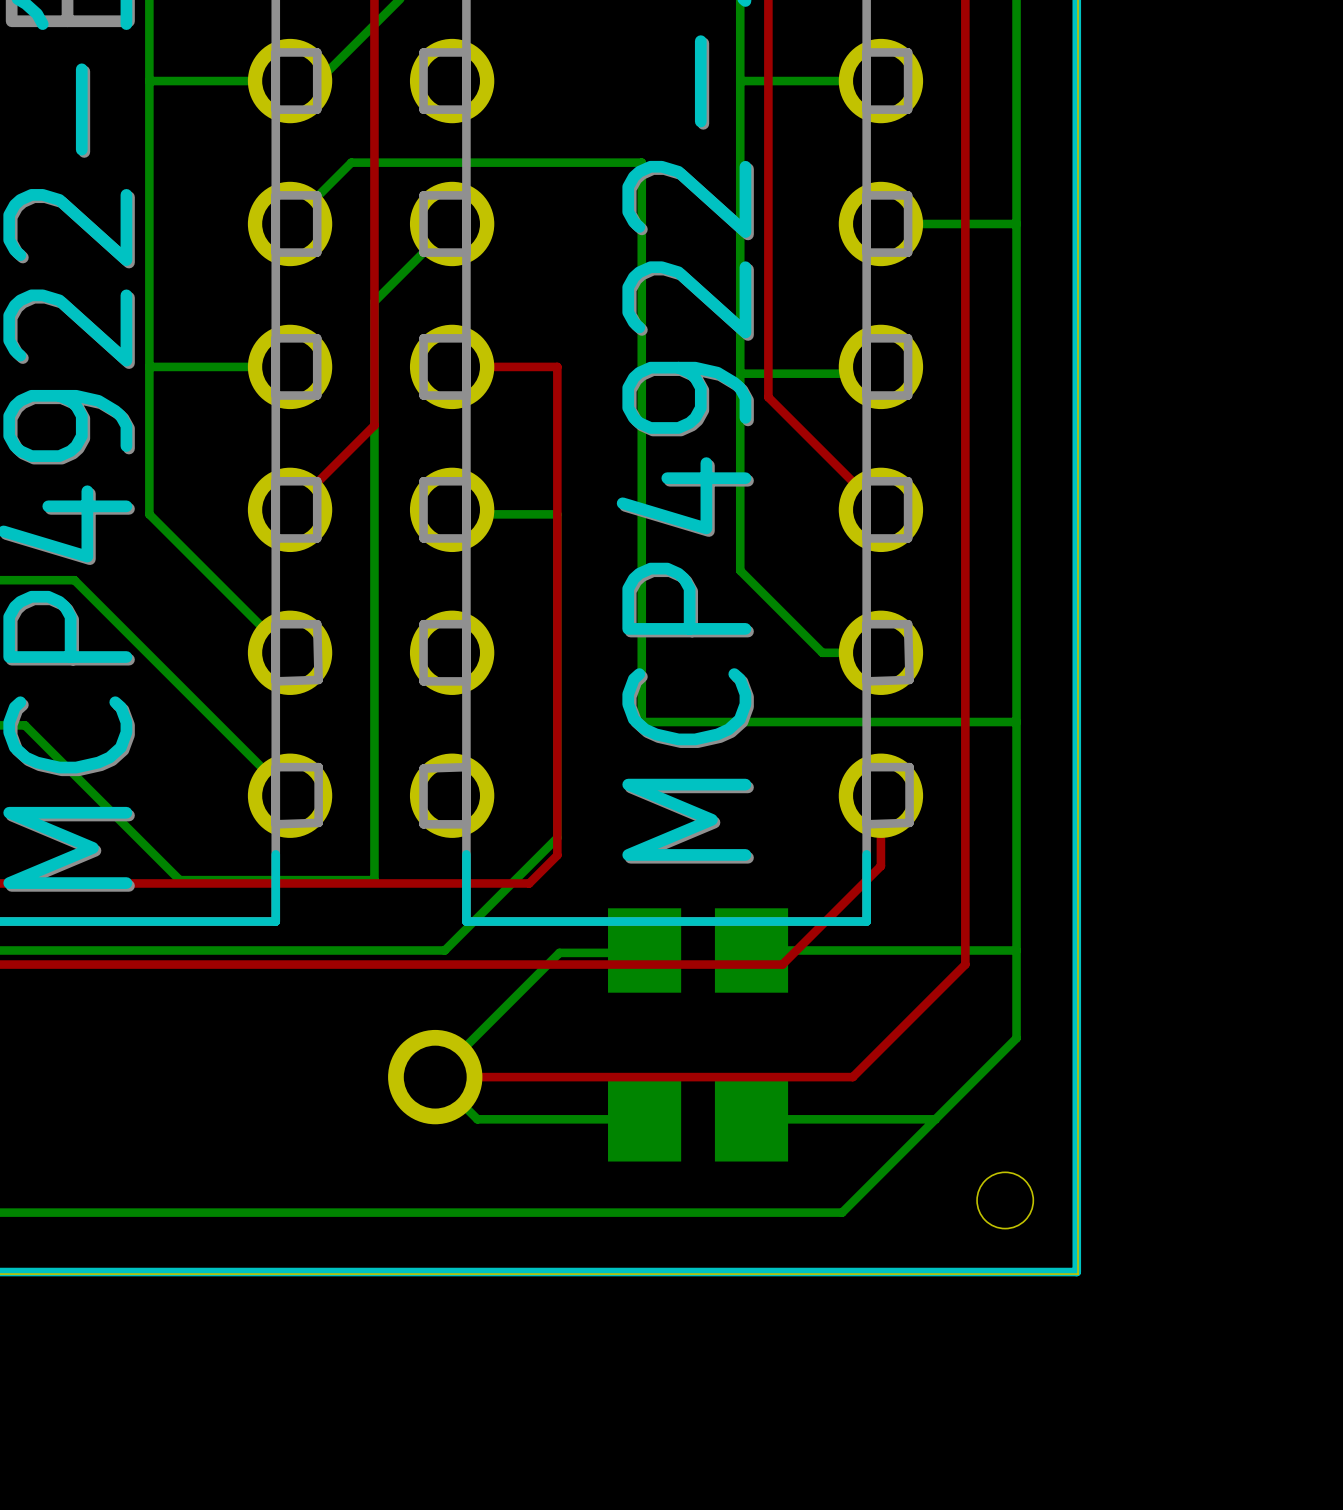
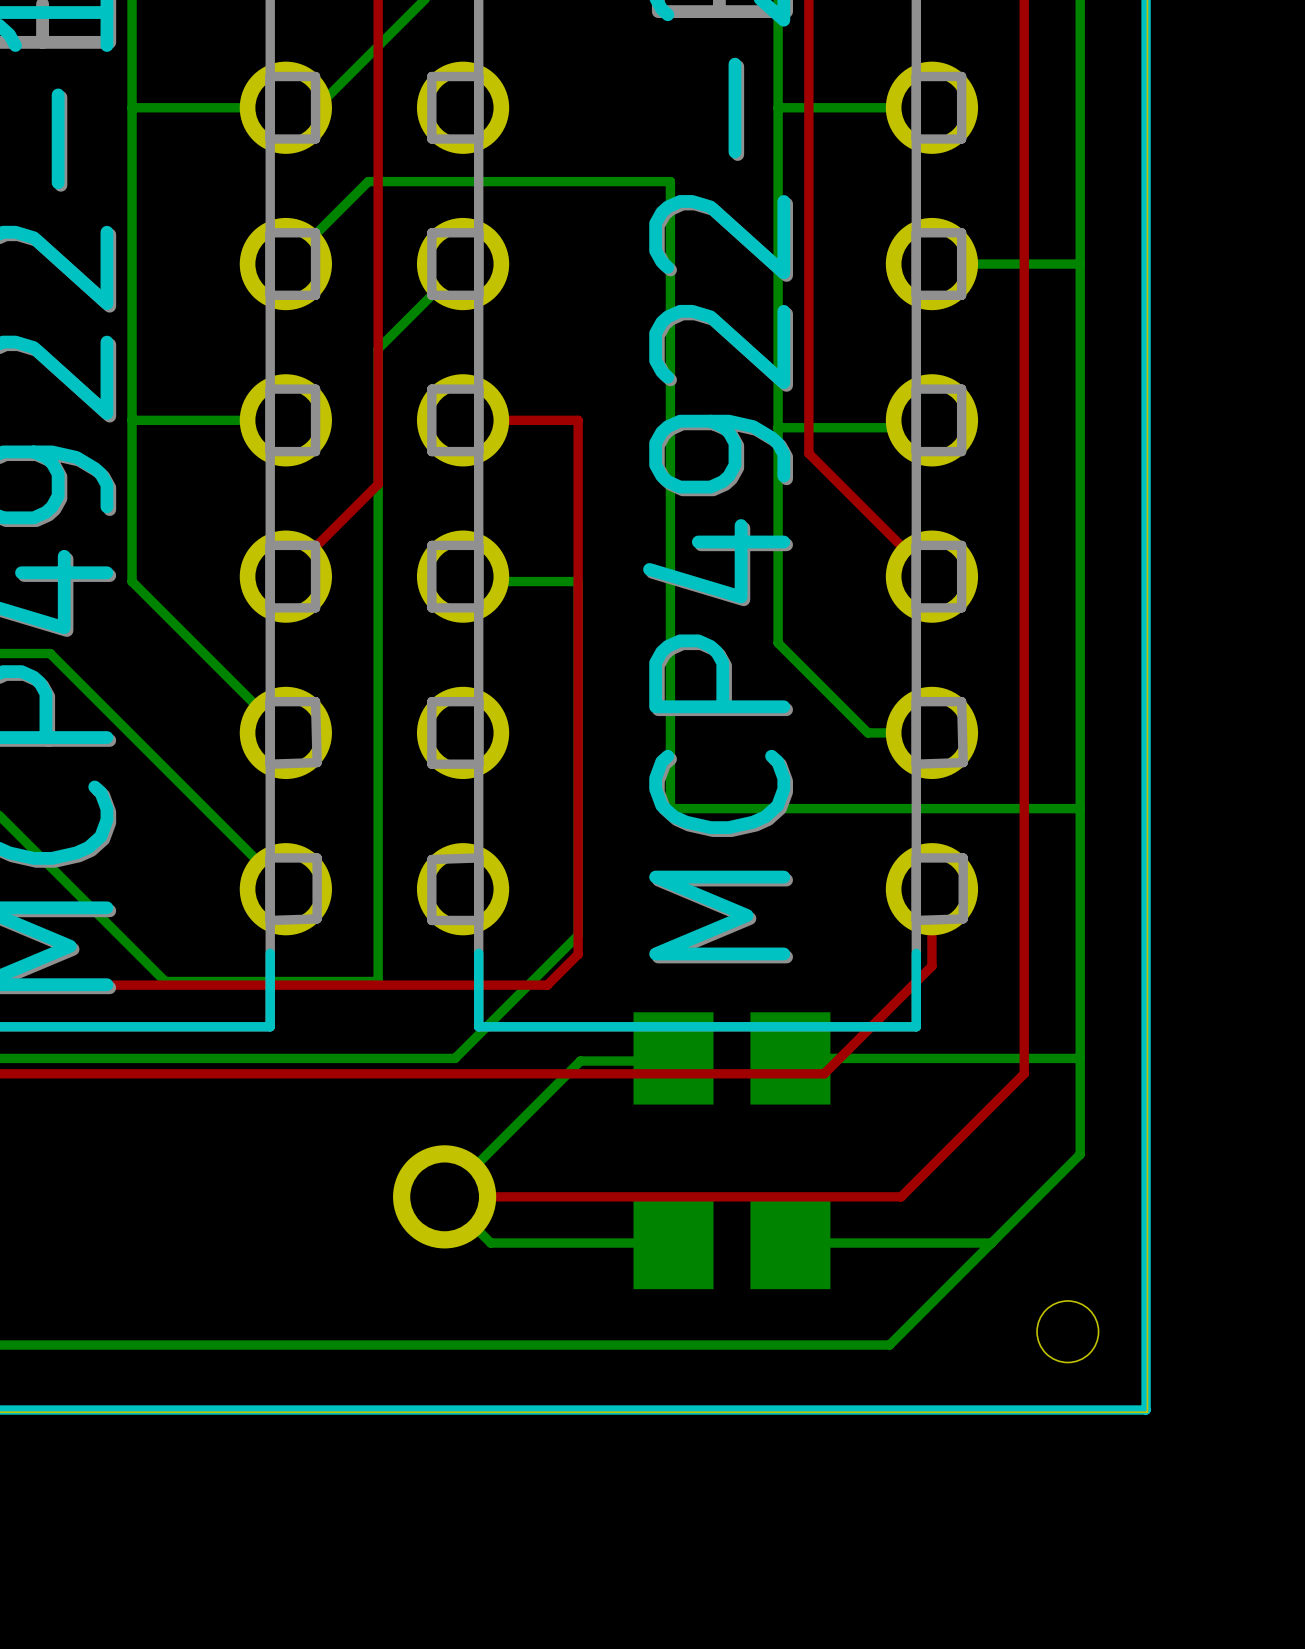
bottom track: (351, 162) (641, 162) -> (352, 196) (368, 181) (670, 181) (670, 196)

